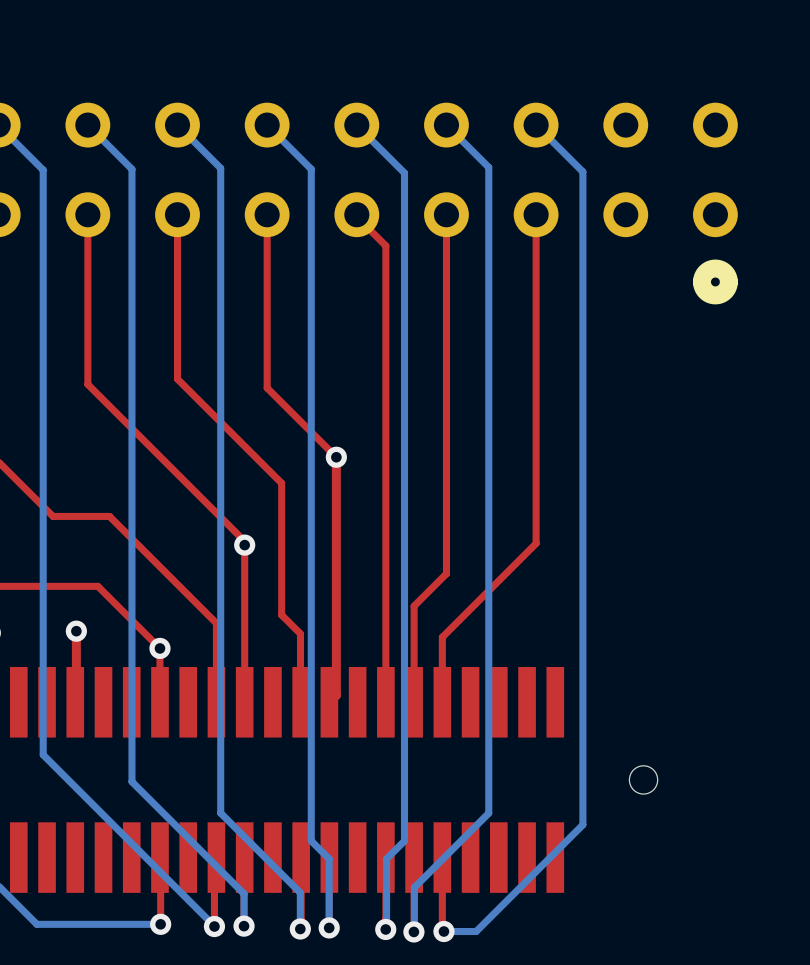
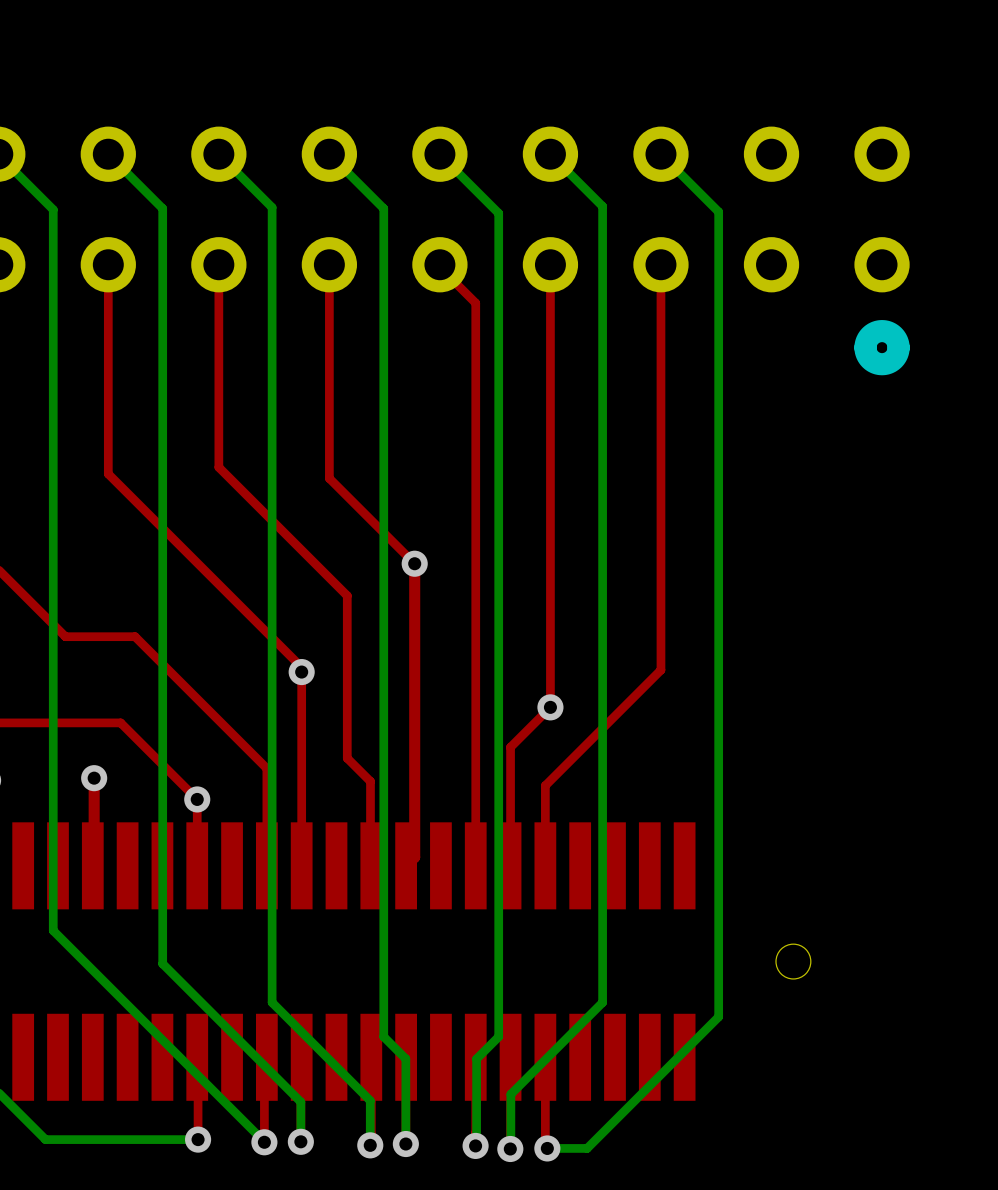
via: none -> (550, 707)

